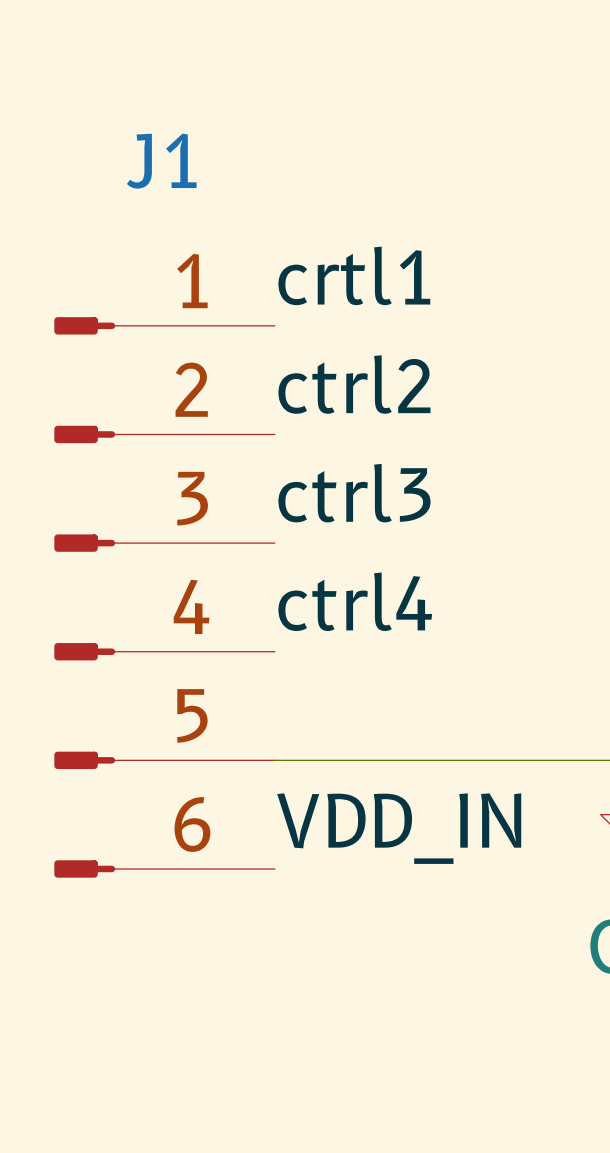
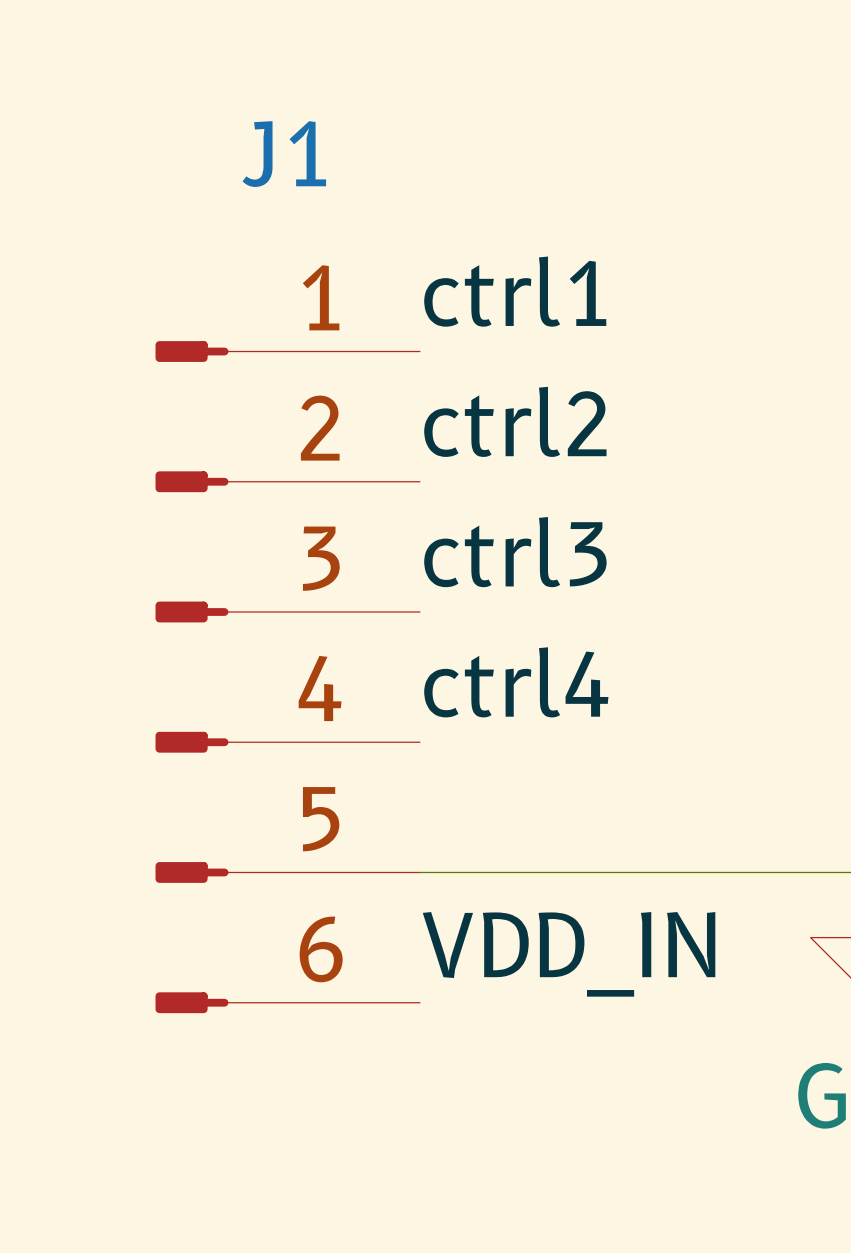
label: crtl1 (354, 275) -> ctrl1 (515, 291)

